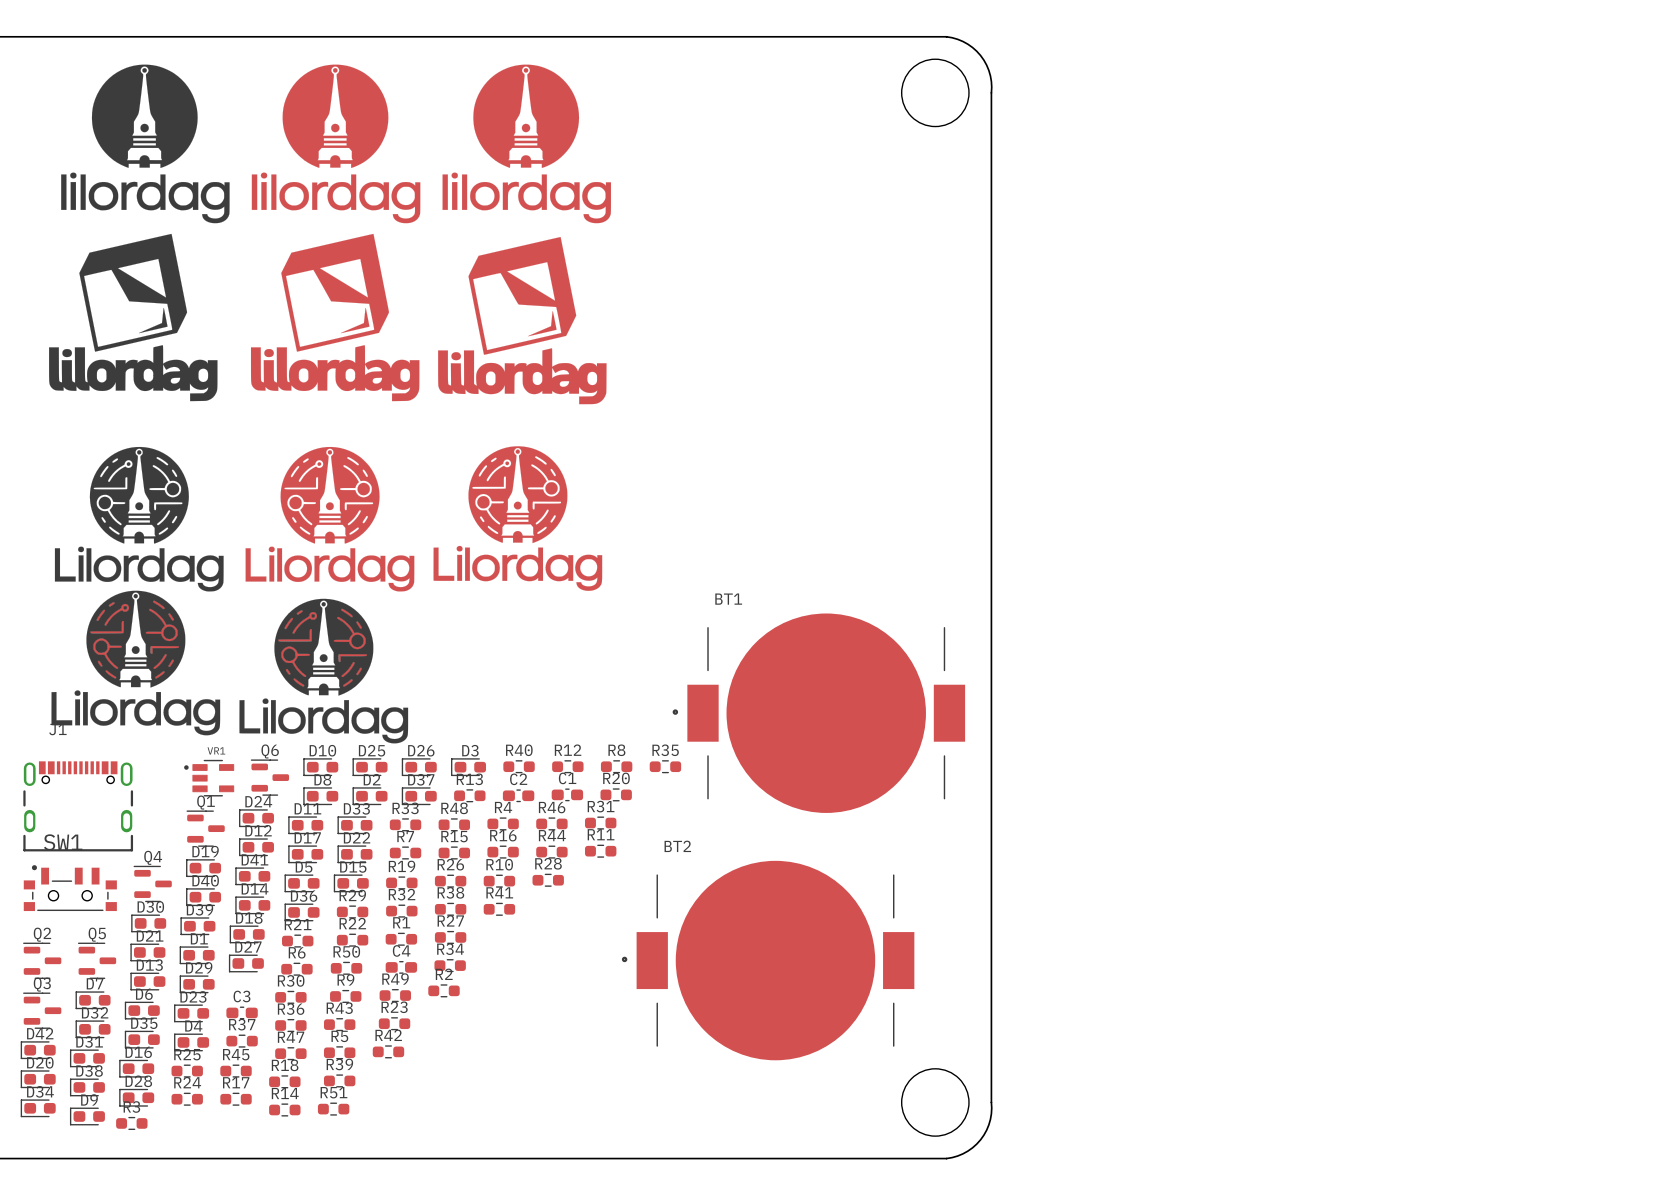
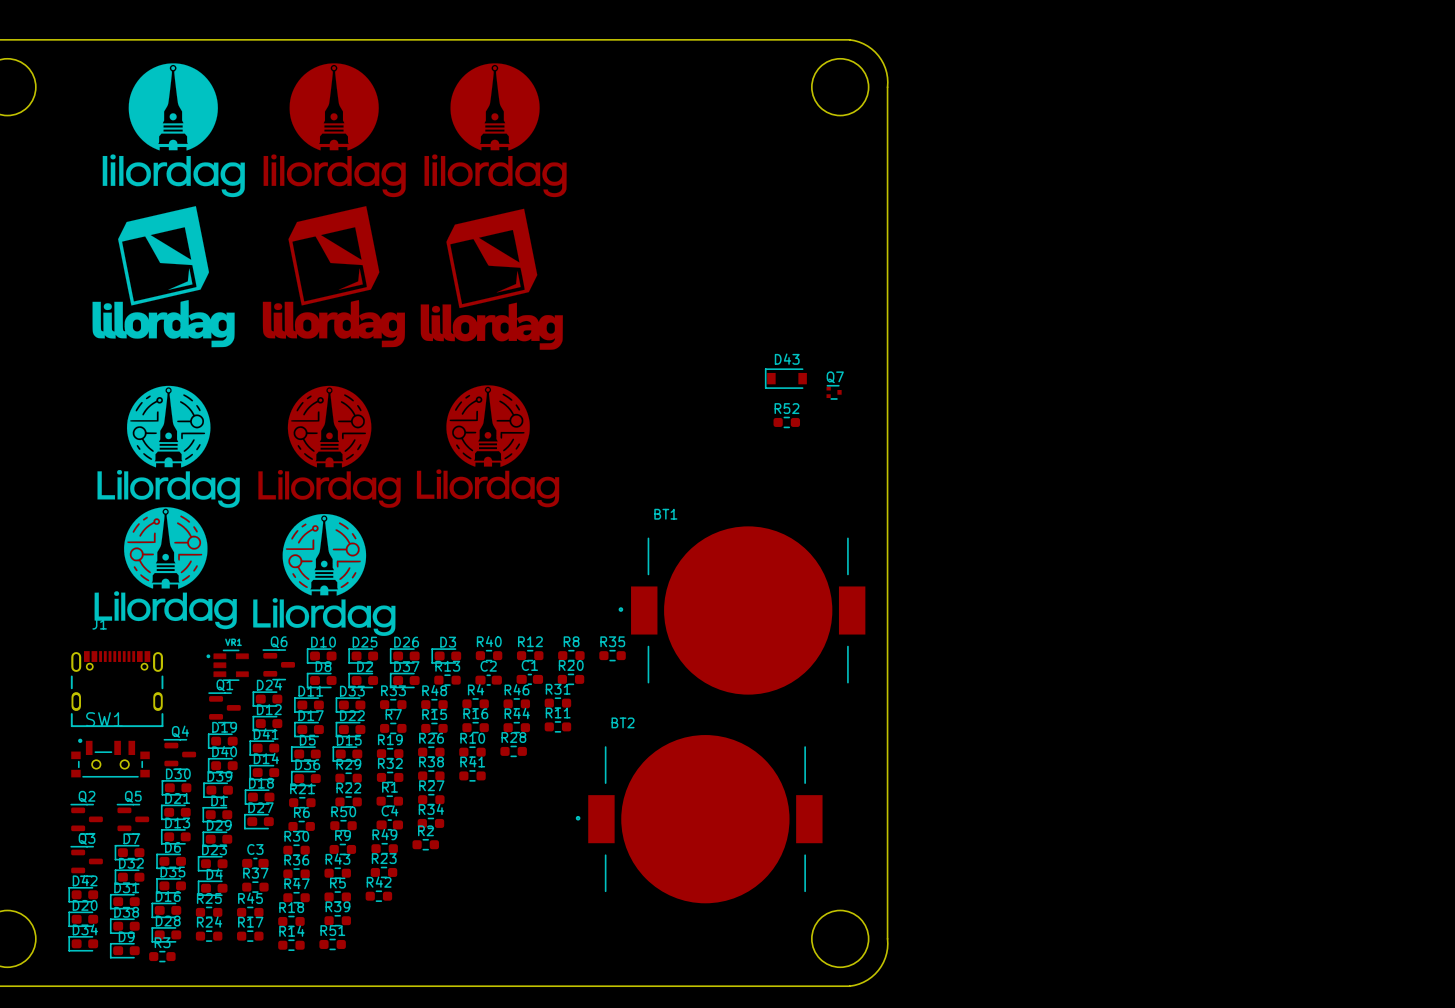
D43: none -> (786, 378)
Q7: none -> (834, 392)
R52: none -> (786, 422)

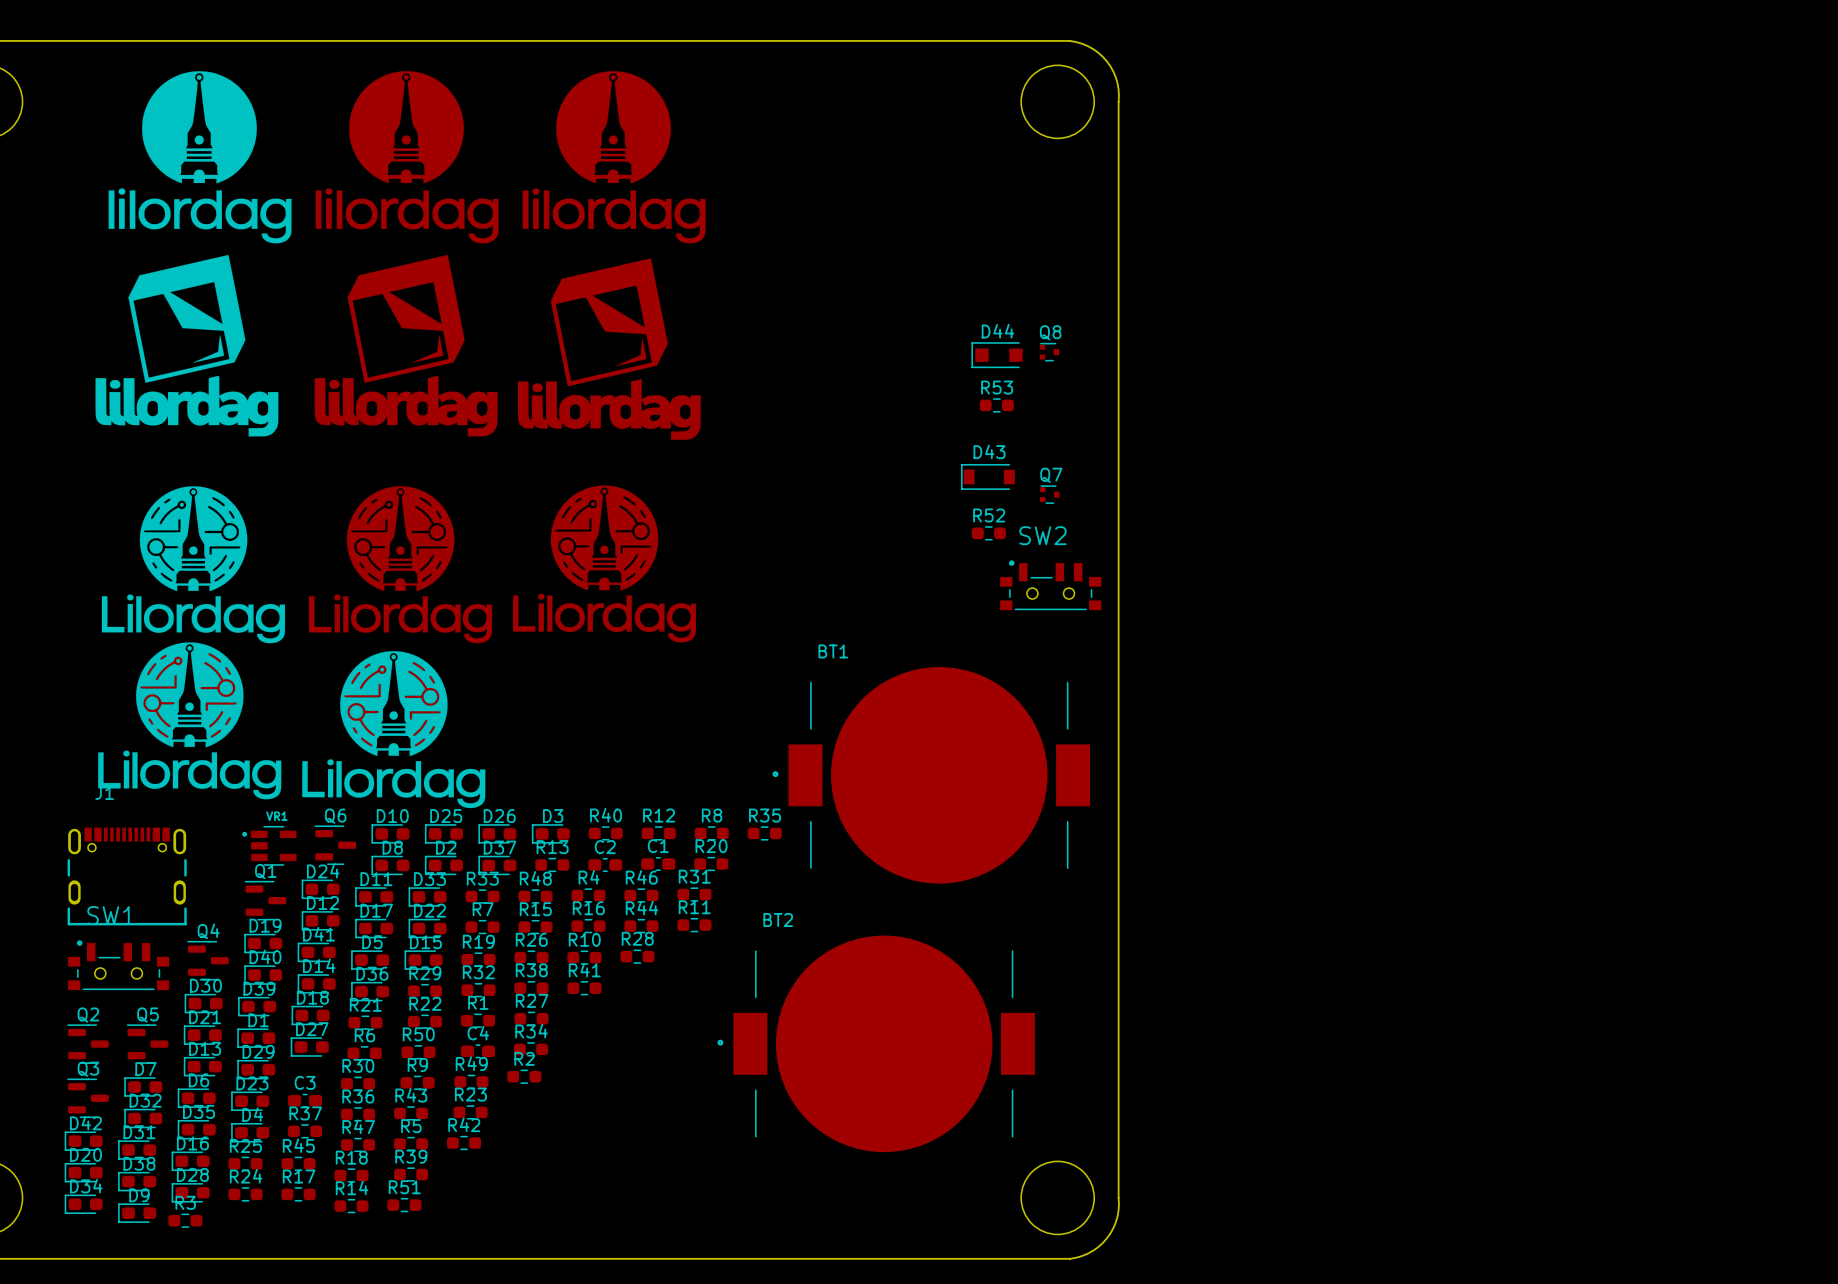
Q8: none -> (1049, 352)
D44: none -> (997, 355)
R53: none -> (996, 405)
SW2: none -> (1050, 585)

